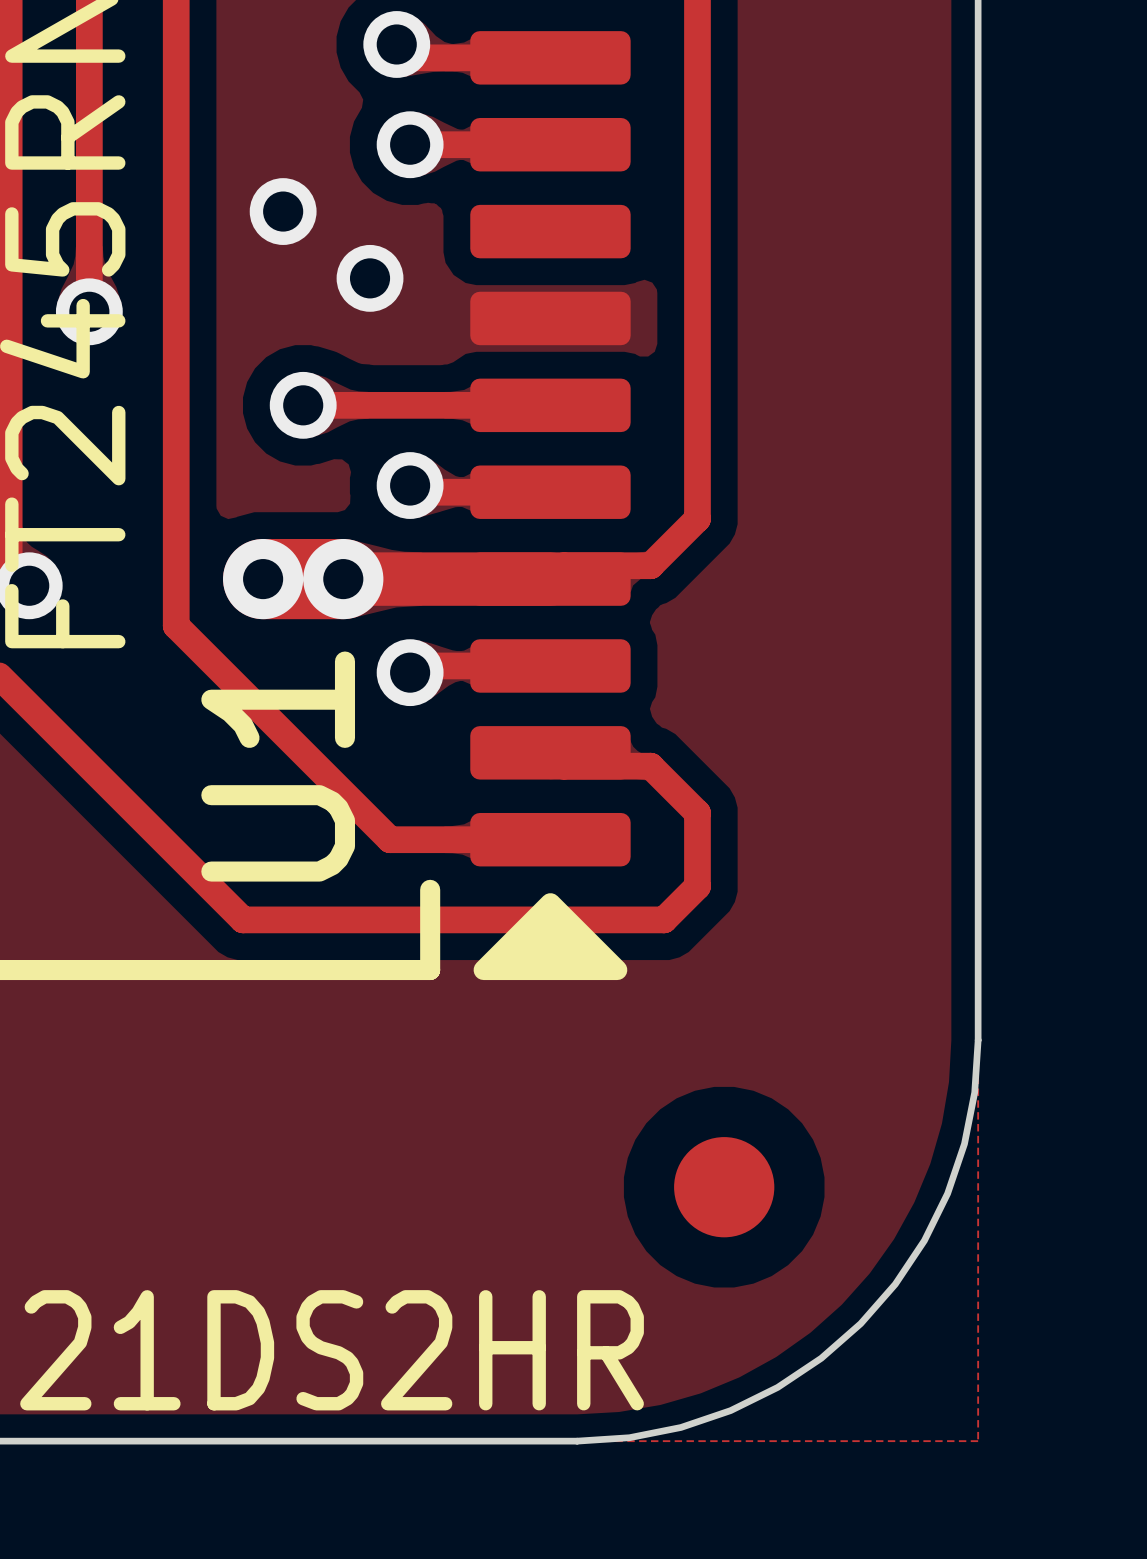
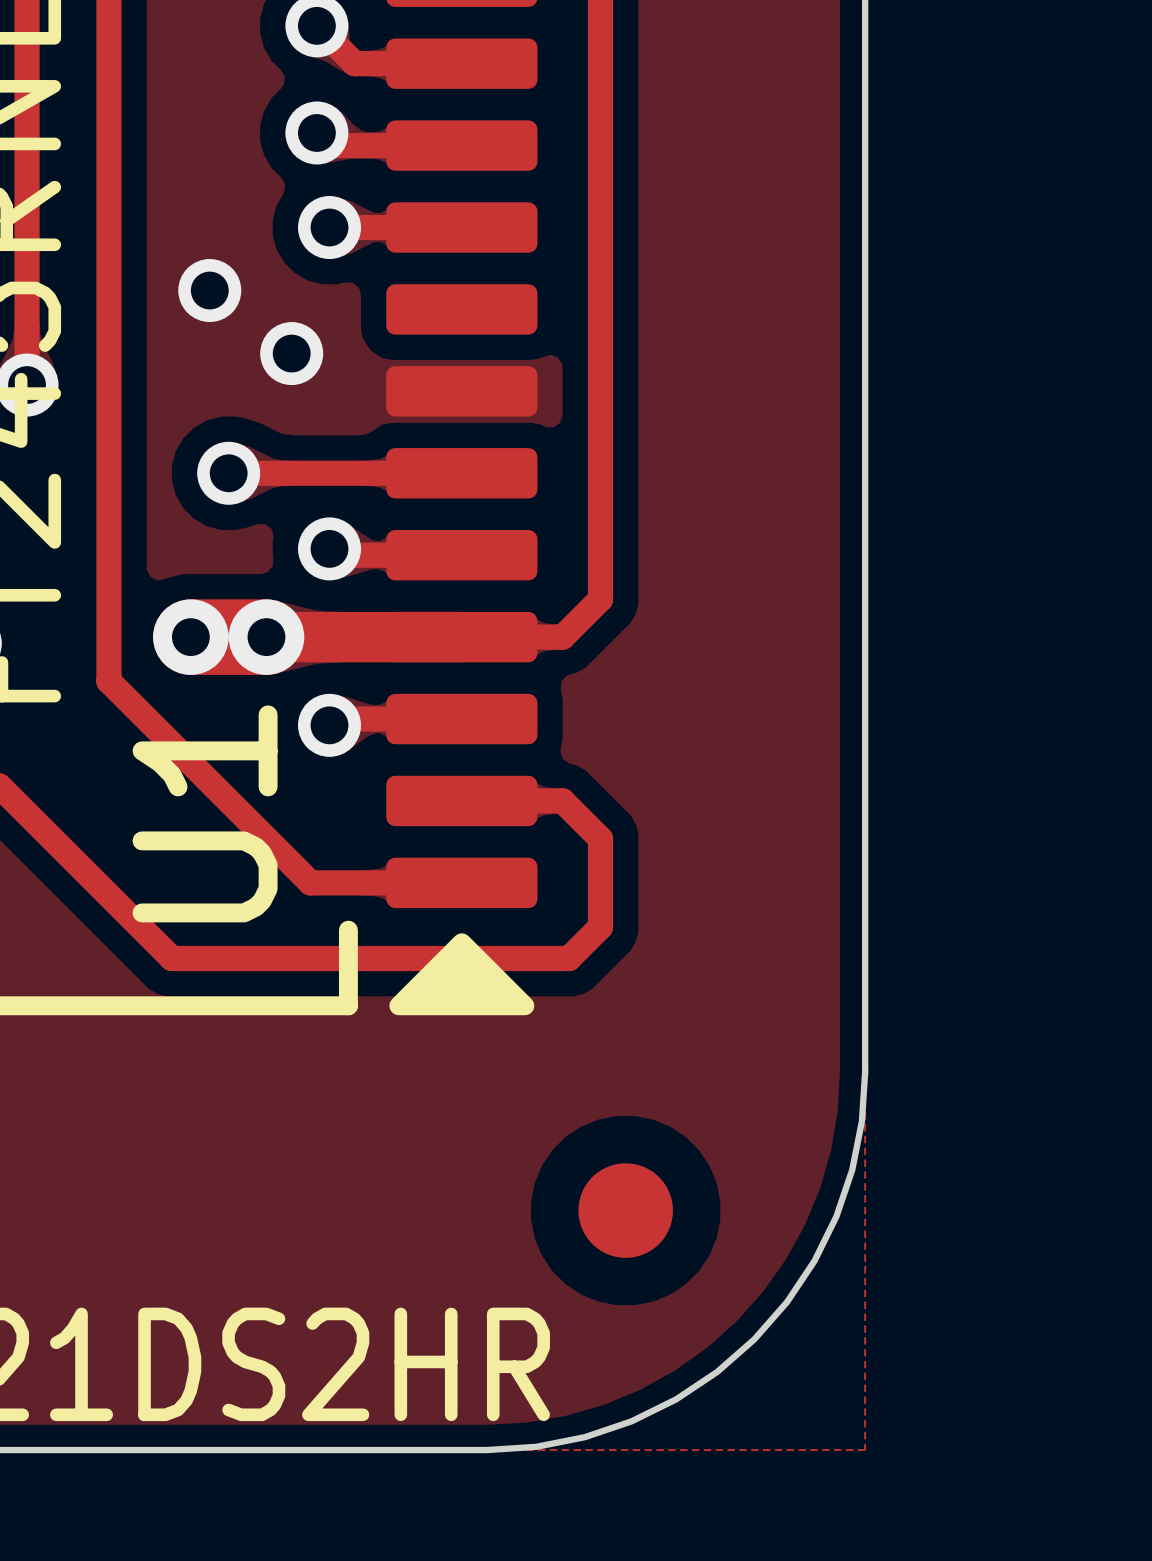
track: (697, 518) (650, 565) (563, 565) (550, 579) -> (600, 580) (600, 599) (562, 637) (461, 637)
track: (550, 752) (563, 766) (650, 766) (697, 812) -> (461, 800) (562, 800) (600, 838) (600, 857)

